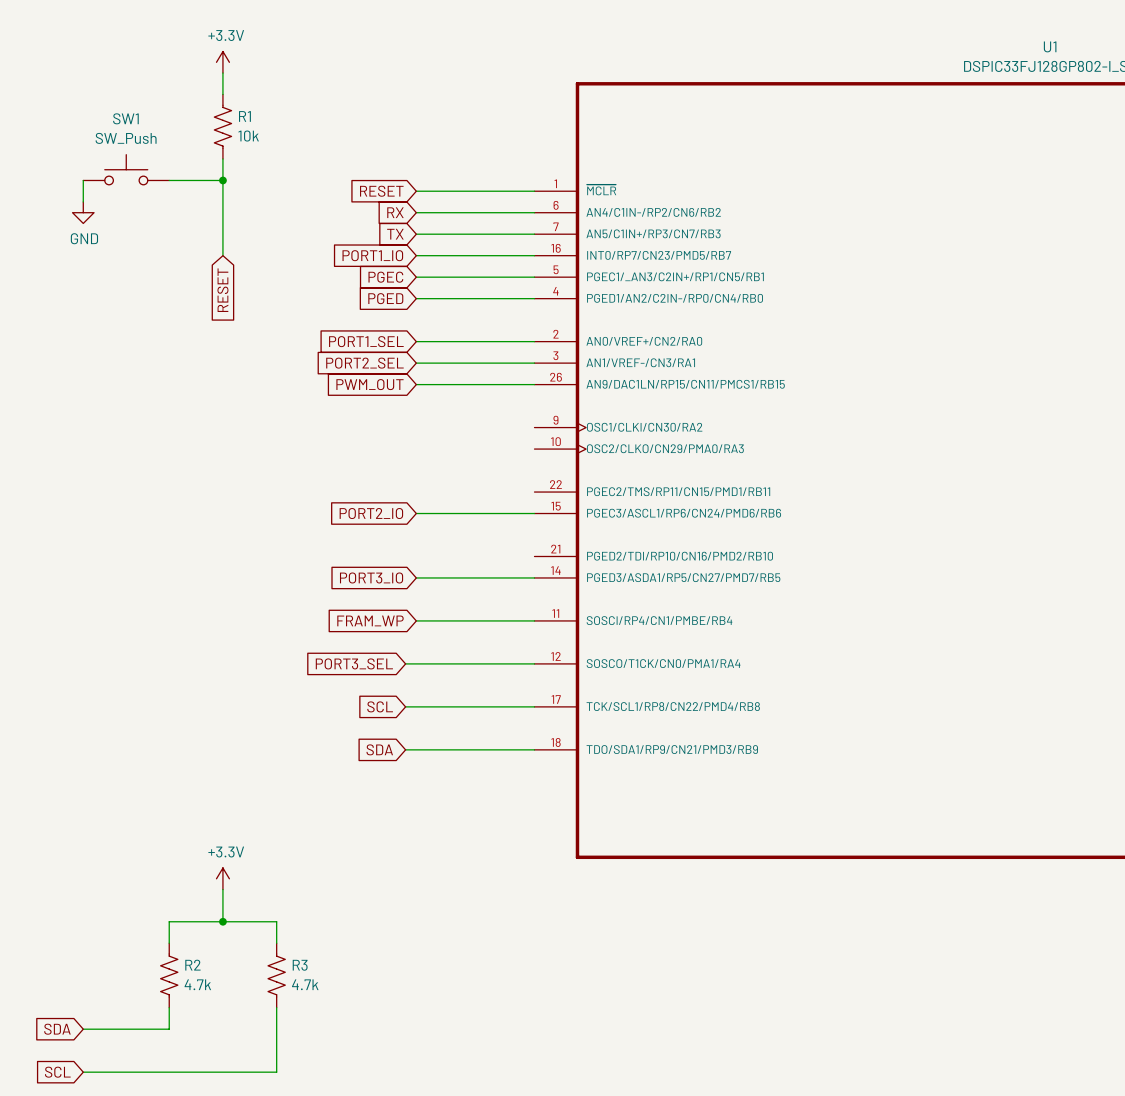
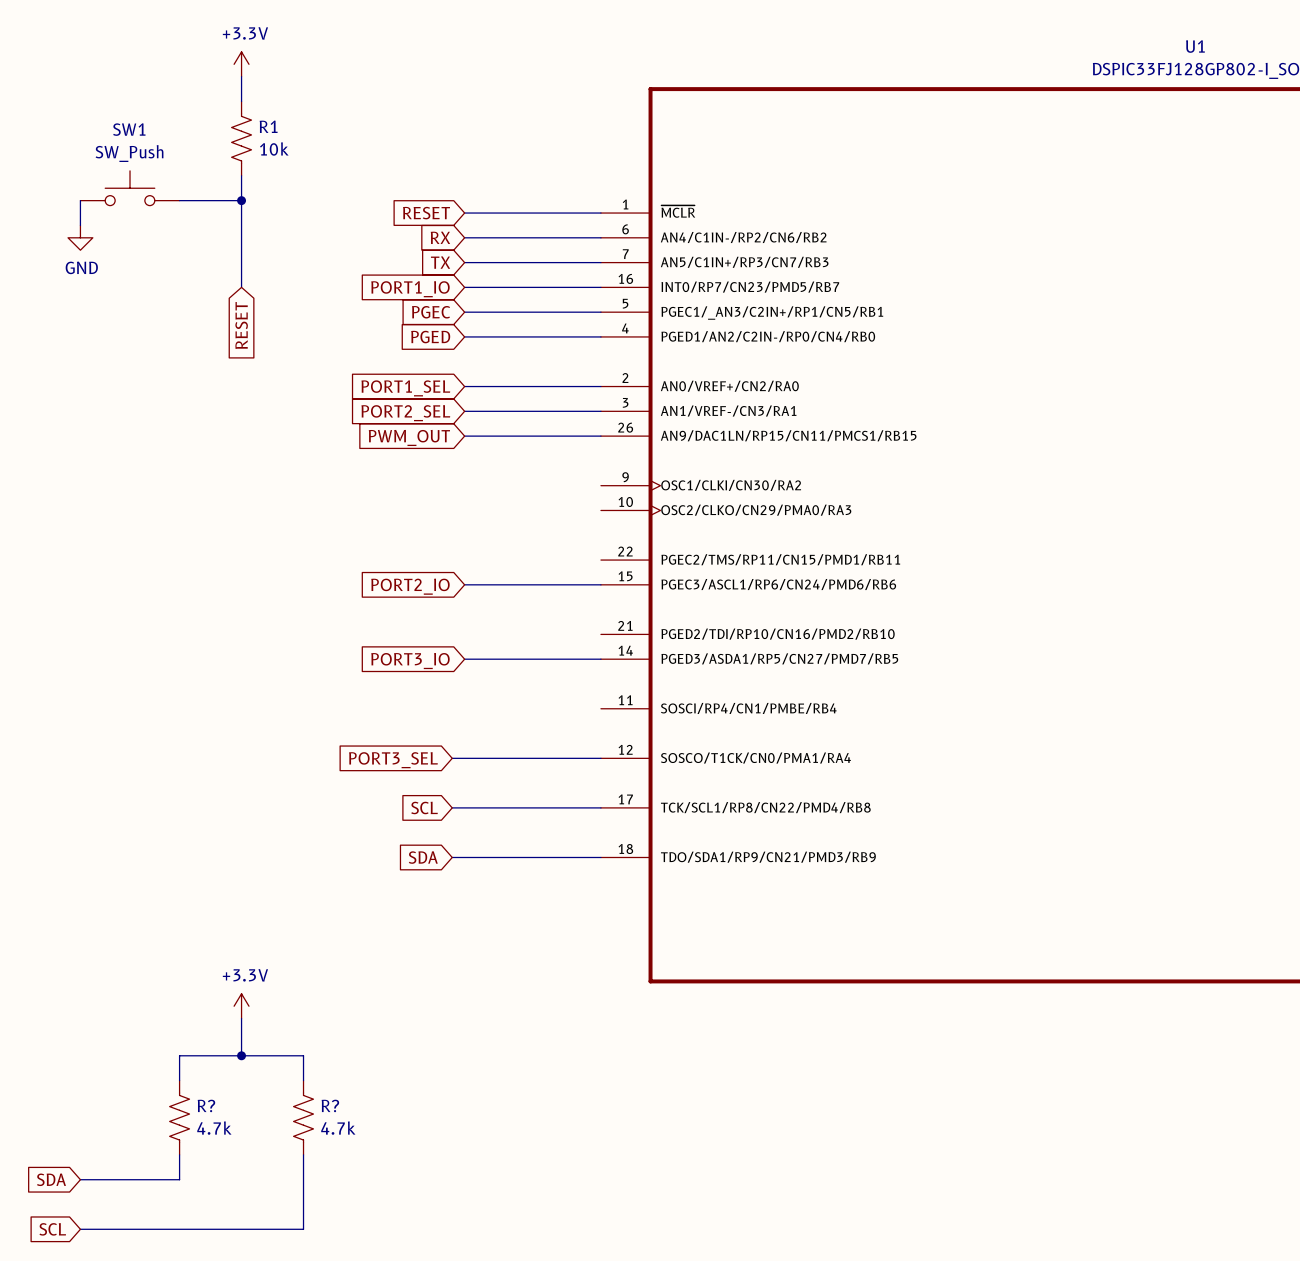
global label: FRAM_WP (370, 620) -> none
wire: (416, 620) (534, 620) -> none
R2 name: R2 (192, 965) -> R? (206, 1105)
R3 name: R3 (300, 965) -> R? (330, 1105)

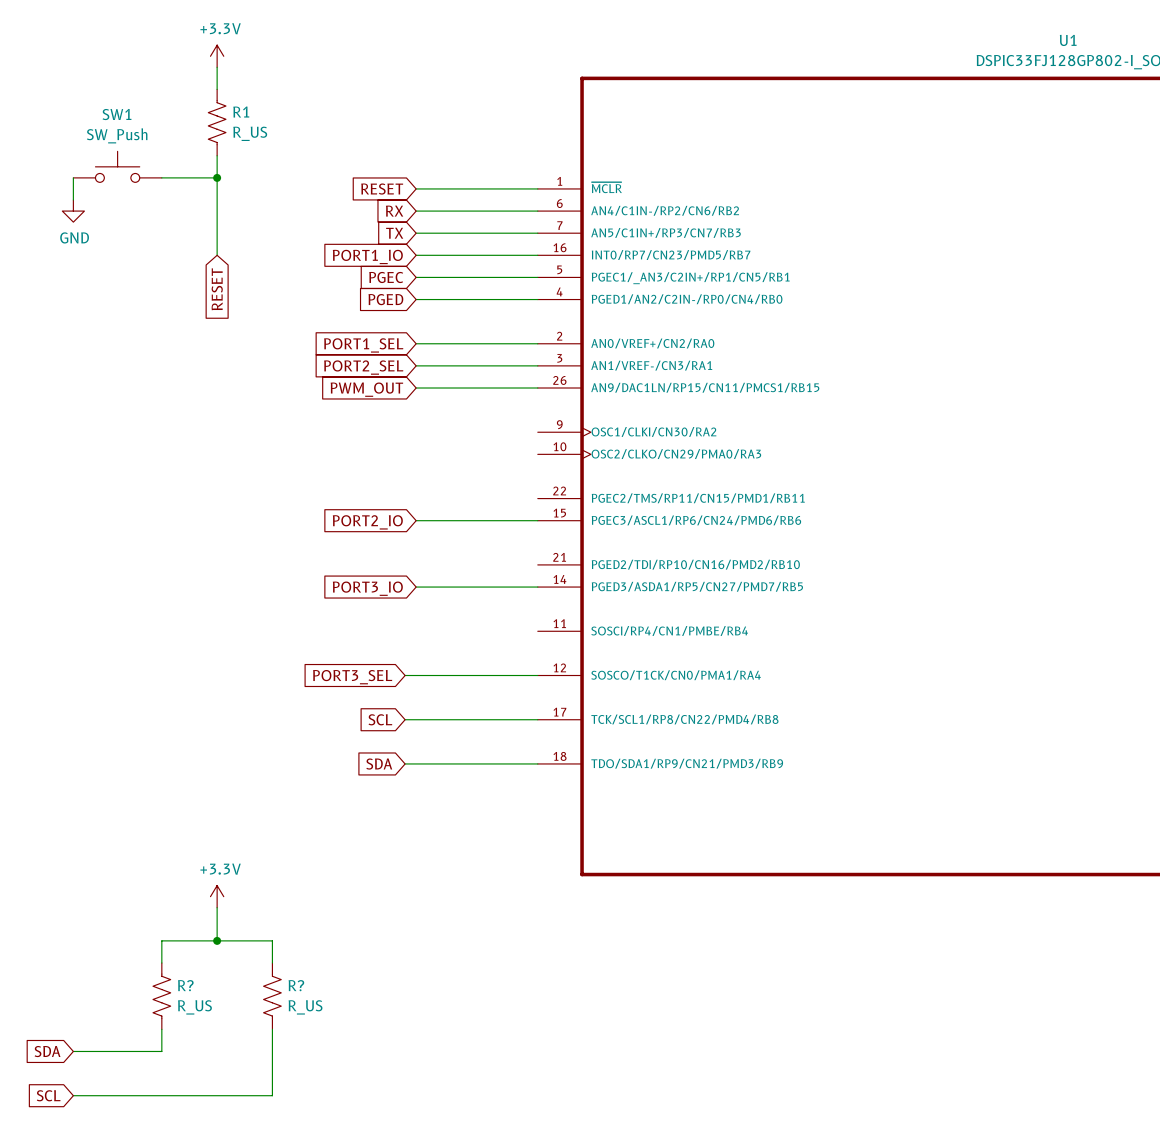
R1 value: 10k (274, 149) -> R_US (250, 133)
R? value: 4.7k (214, 1128) -> R_US (194, 1007)
R? value: 4.7k (338, 1128) -> R_US (305, 1007)

